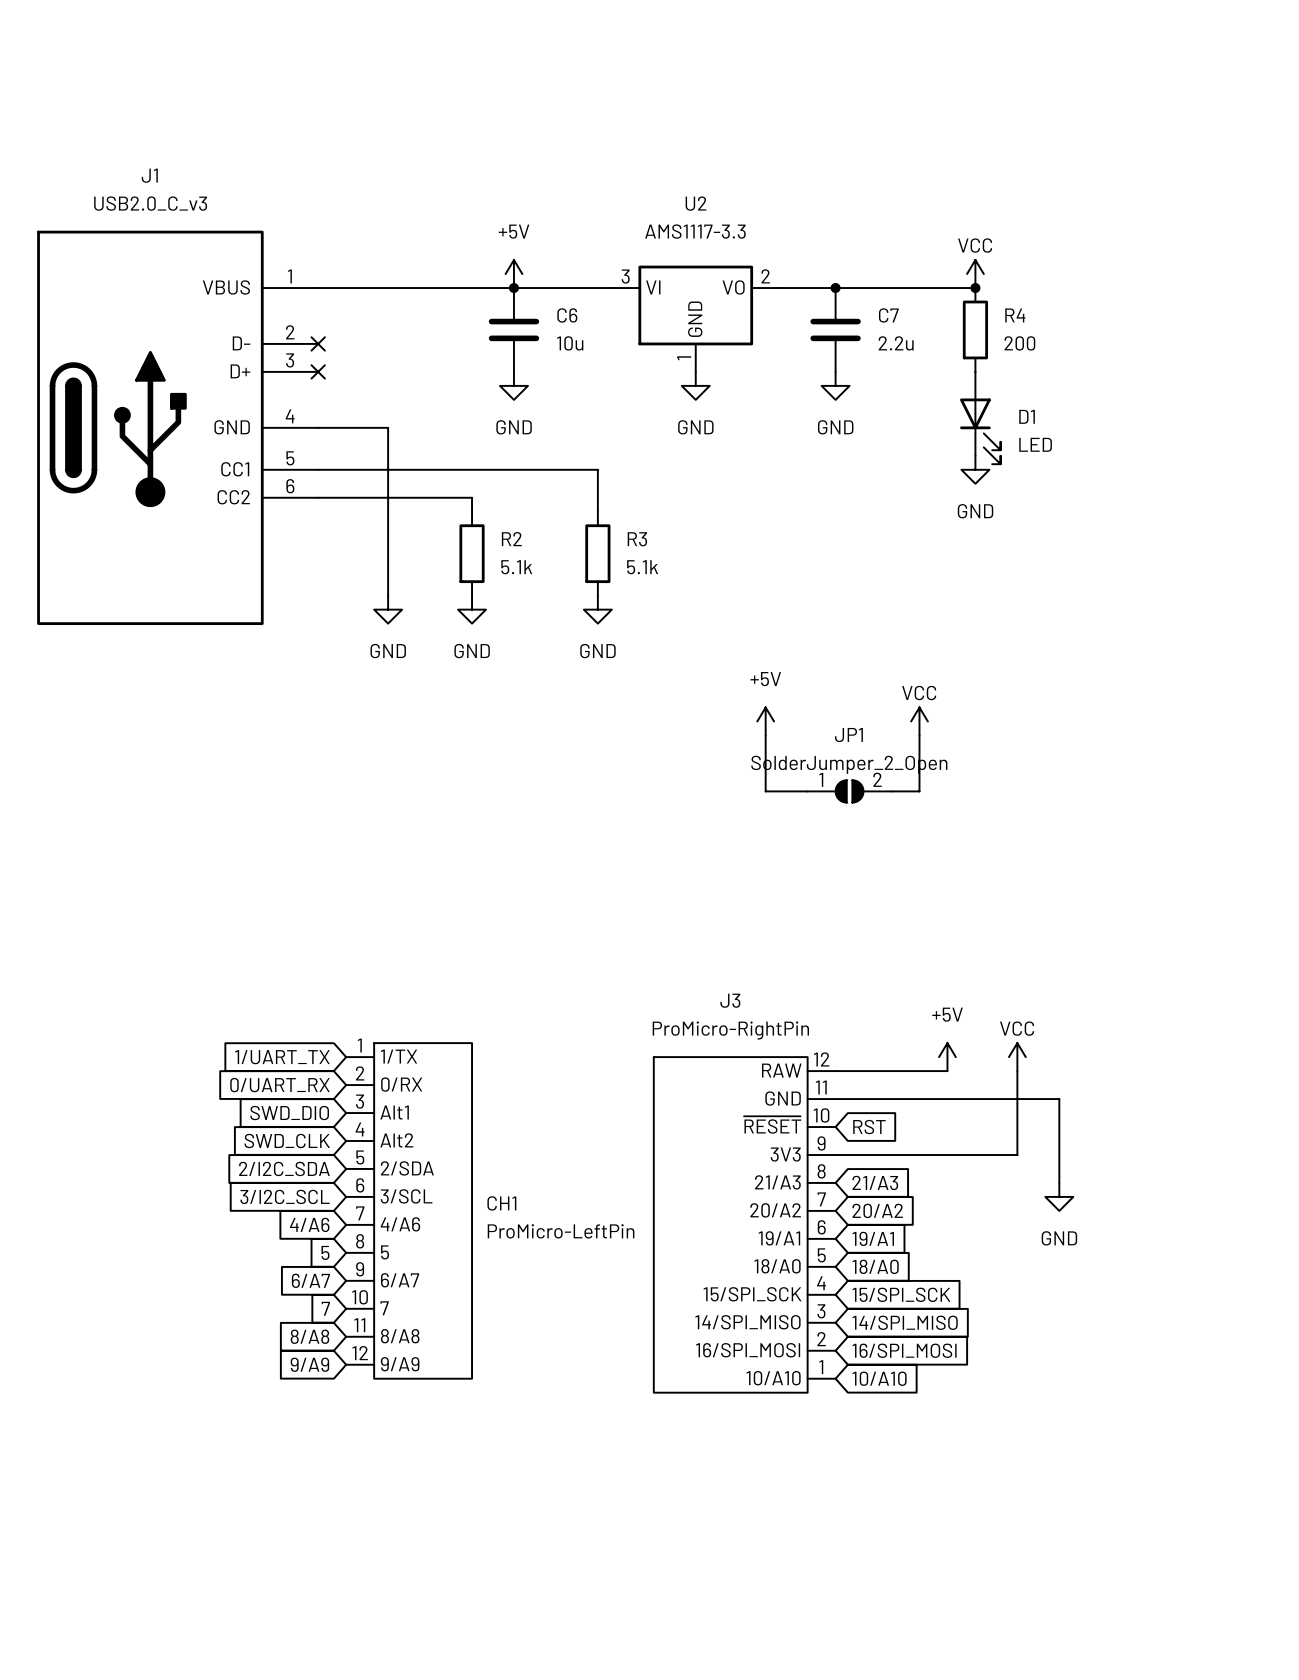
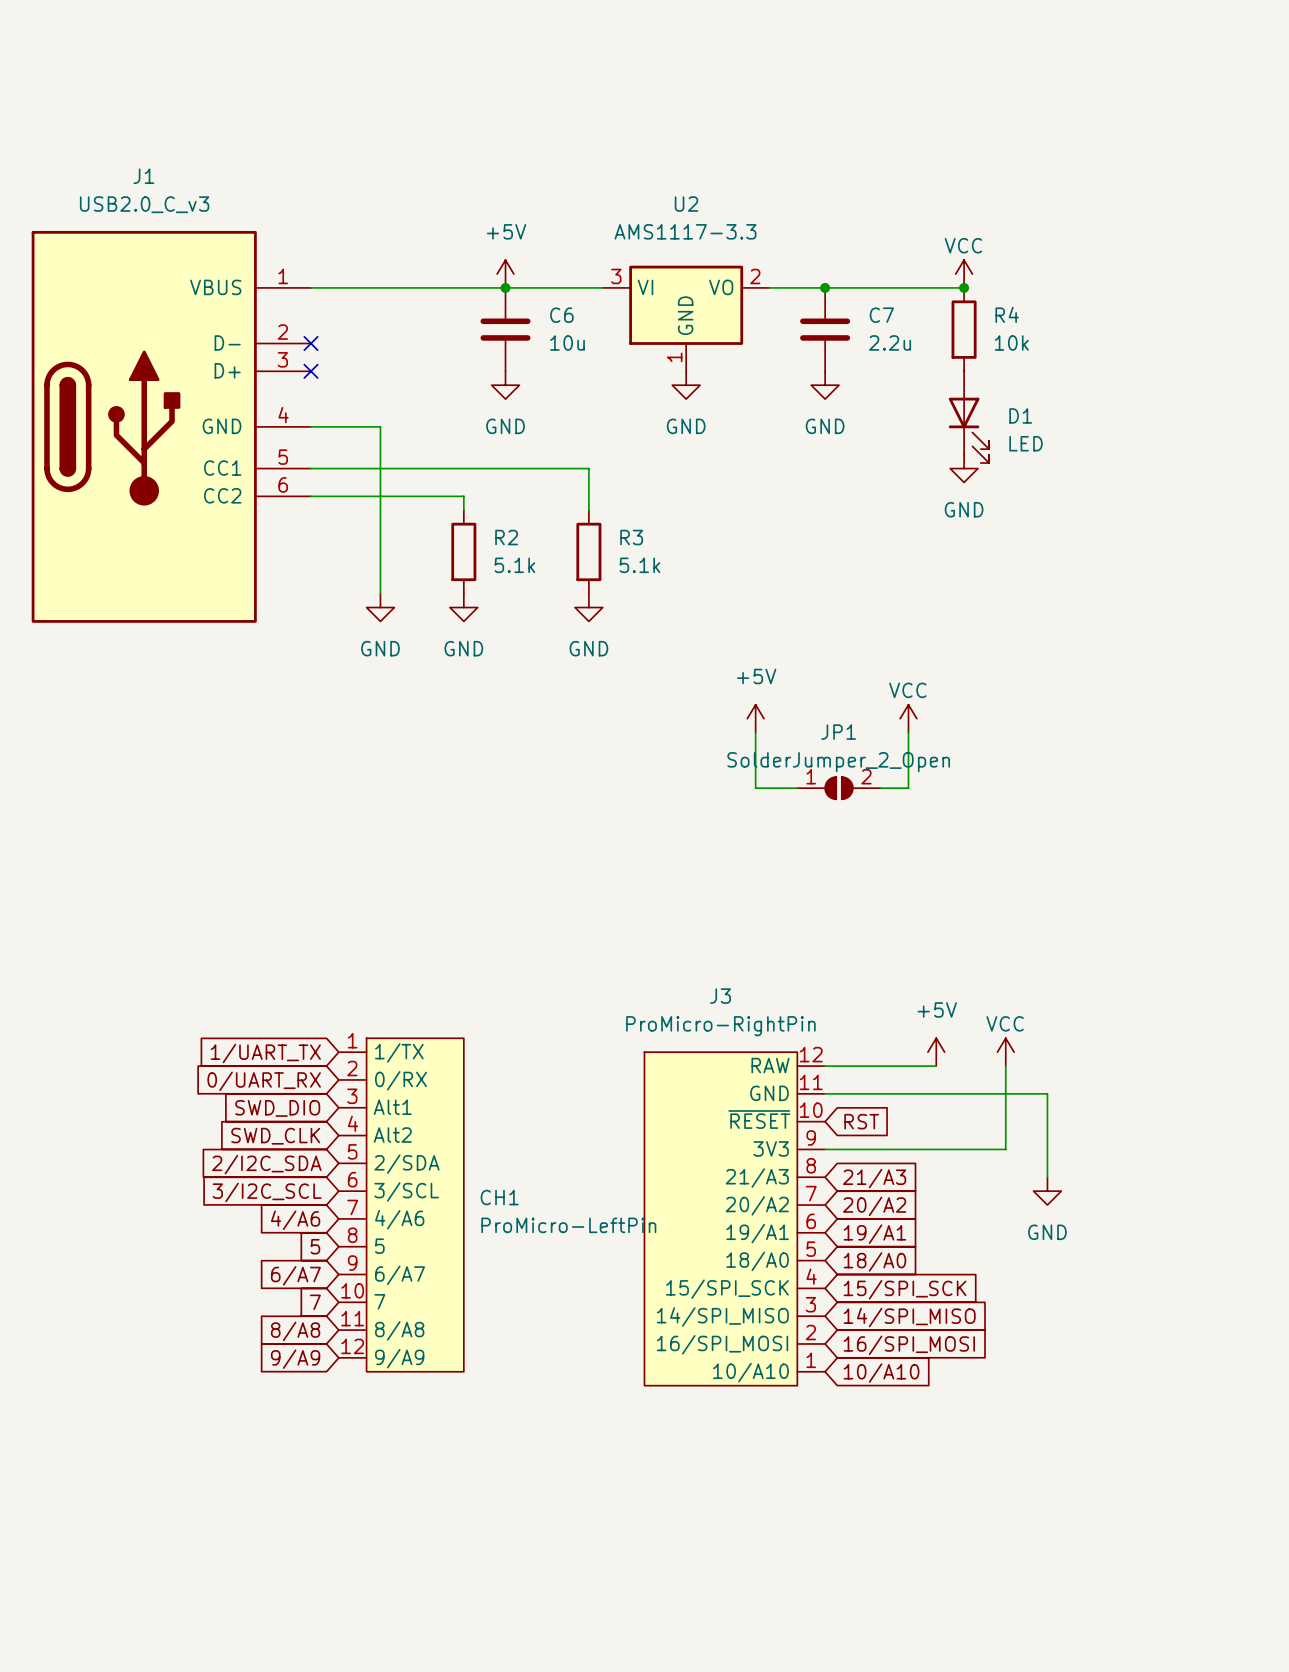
R4 value: 200 (1019, 343) -> 10k (1011, 342)

